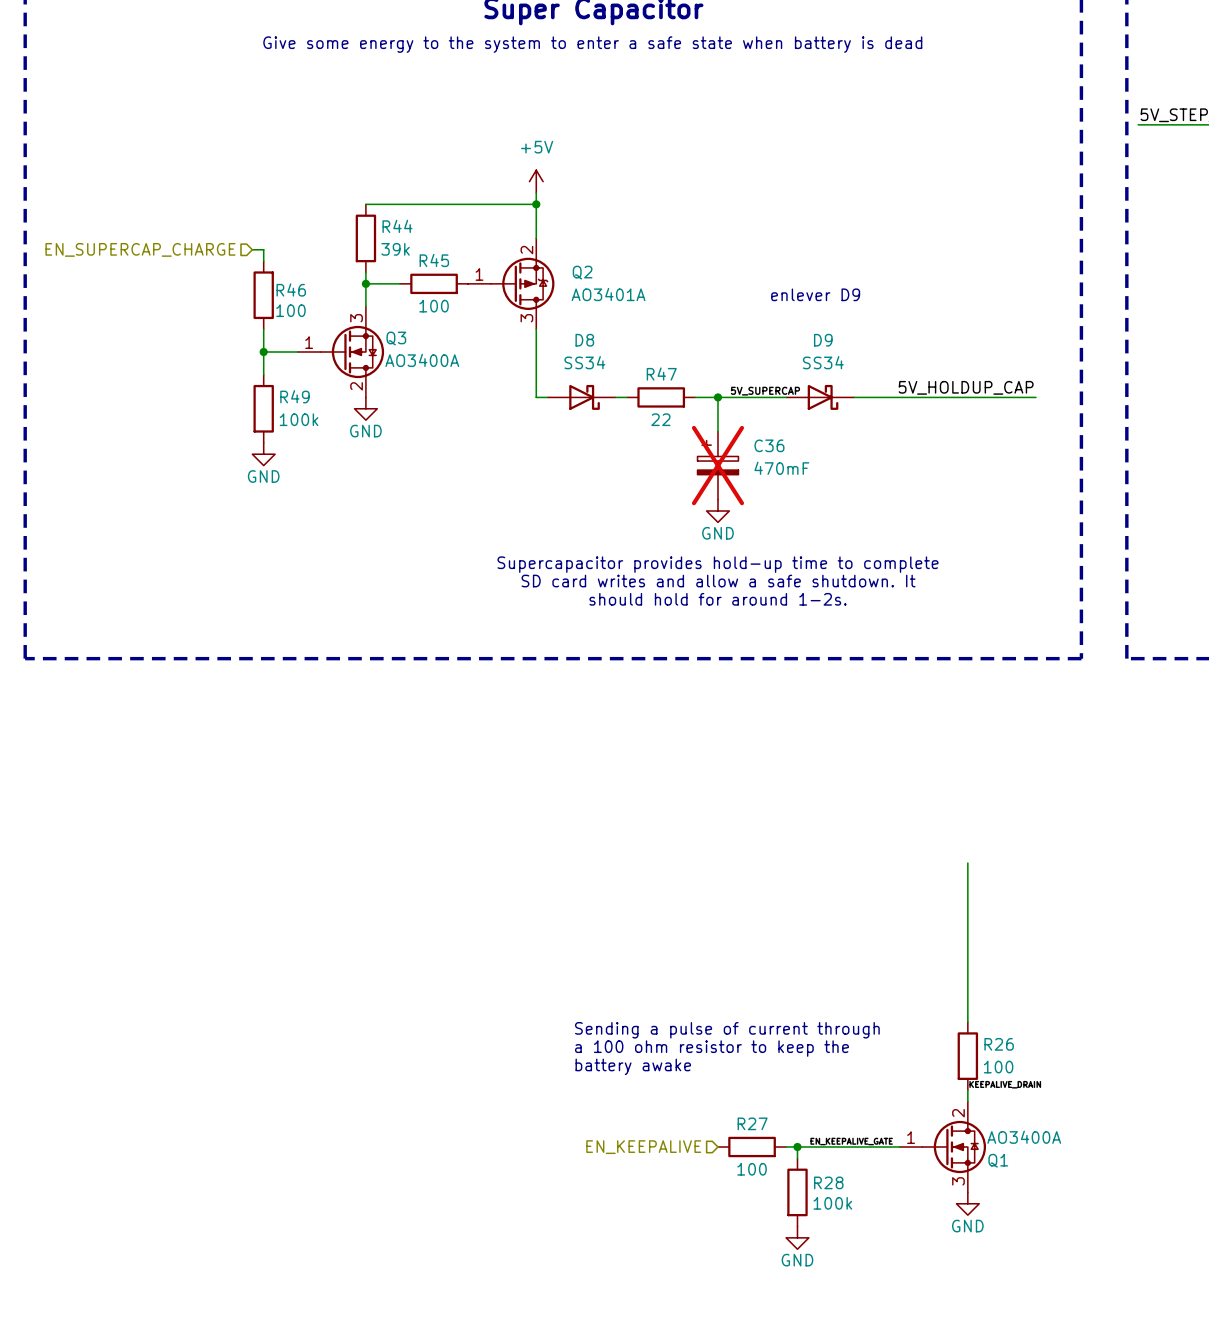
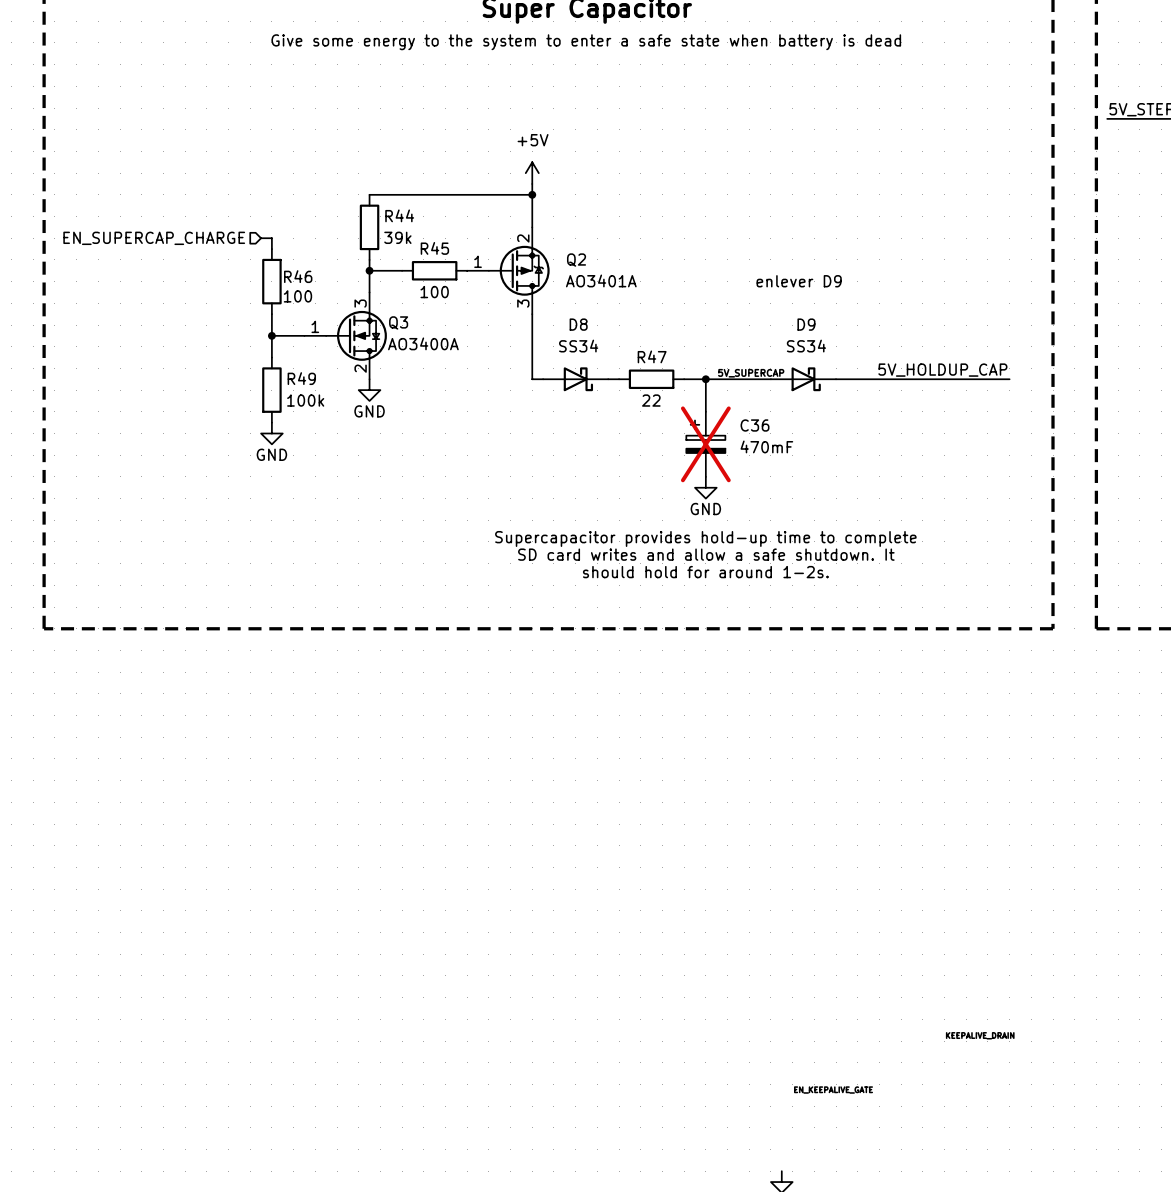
wire: (967, 863) (967, 1022) -> none
text: Sending a pulse of current through (727, 1030) -> none
text: a 100 ohm resistor to keep the (711, 1048) -> none
R26: 100 (967, 1056) -> none
text: battery awake (633, 1066) -> none
wire: (967, 1090) (967, 1101) -> none
hierarchical label: EN_KEEPALIVE (643, 1147) -> none
R27: 100 (752, 1147) -> none
wire: (786, 1147) (899, 1147) -> none
wire: (797, 1147) (797, 1158) -> none
junction: (797, 1147) -> none
Q1: AO3400A (942, 1147) -> none
R28: 100k (797, 1192) -> none
power symbol: GND (967, 1203) -> none

